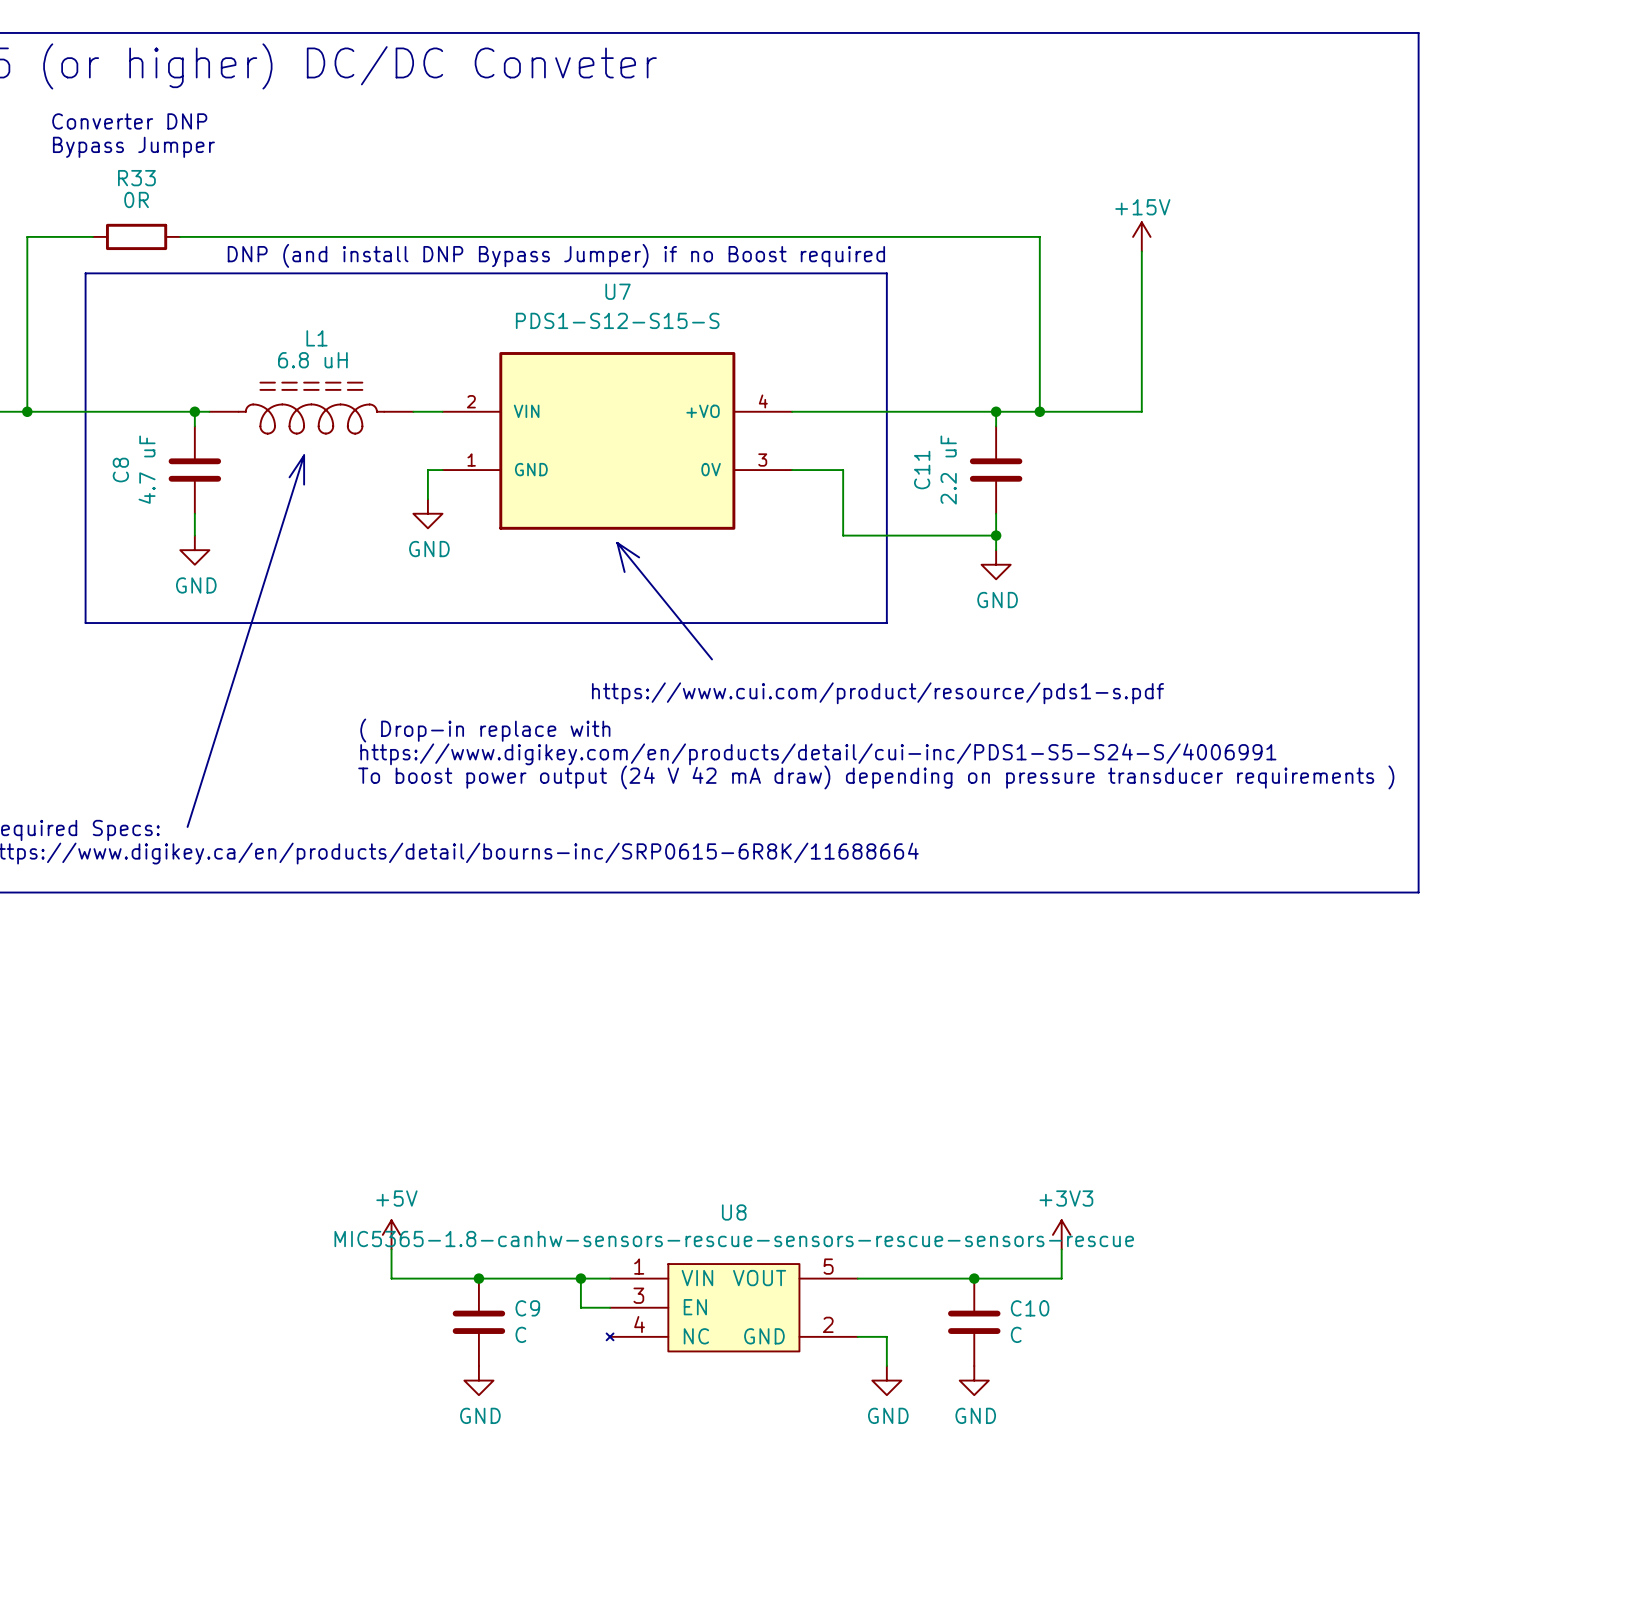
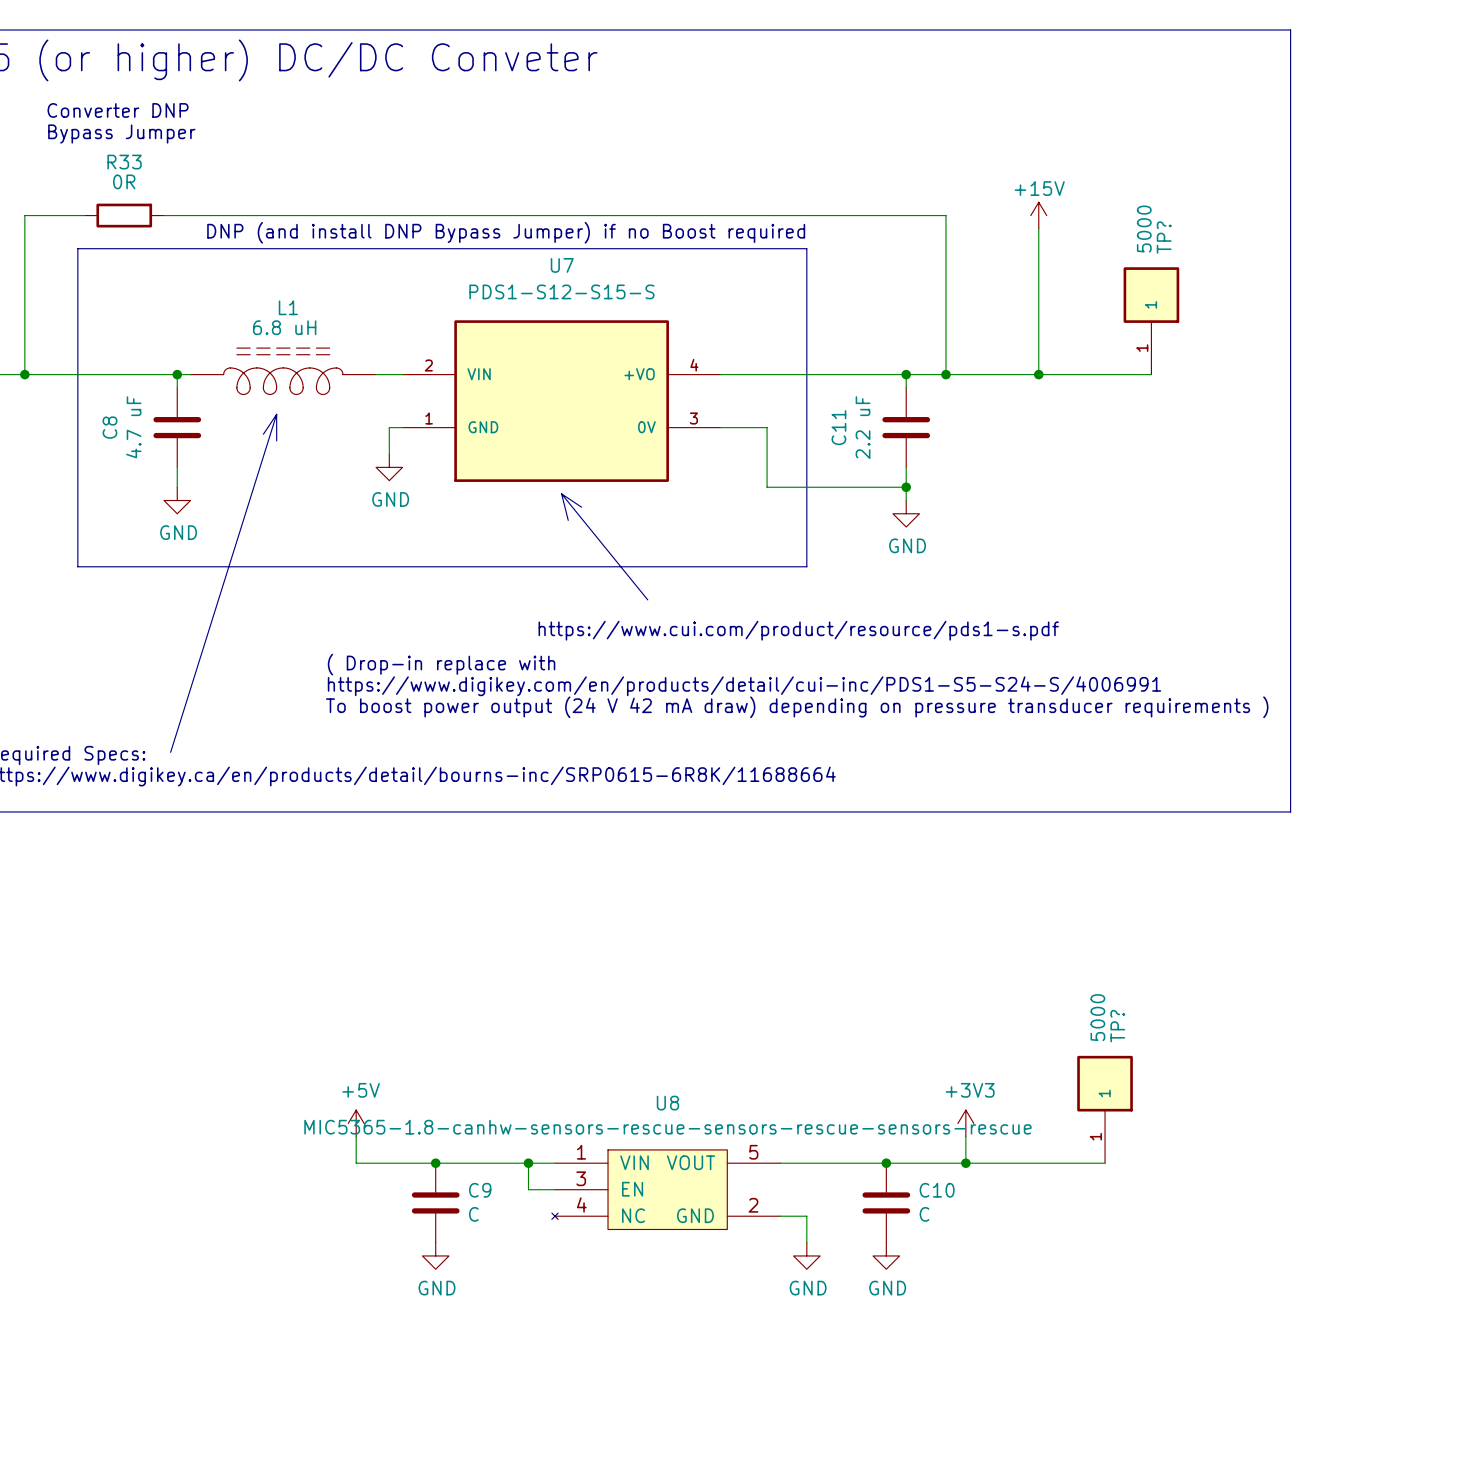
TP?: none -> 5000 (1151, 320)
wire: none -> (1038, 374) (1151, 374)
junction: none -> (1038, 374)
TP?: none -> 5000 (1105, 1109)
wire: none -> (965, 1163) (1105, 1163)
junction: none -> (965, 1163)

